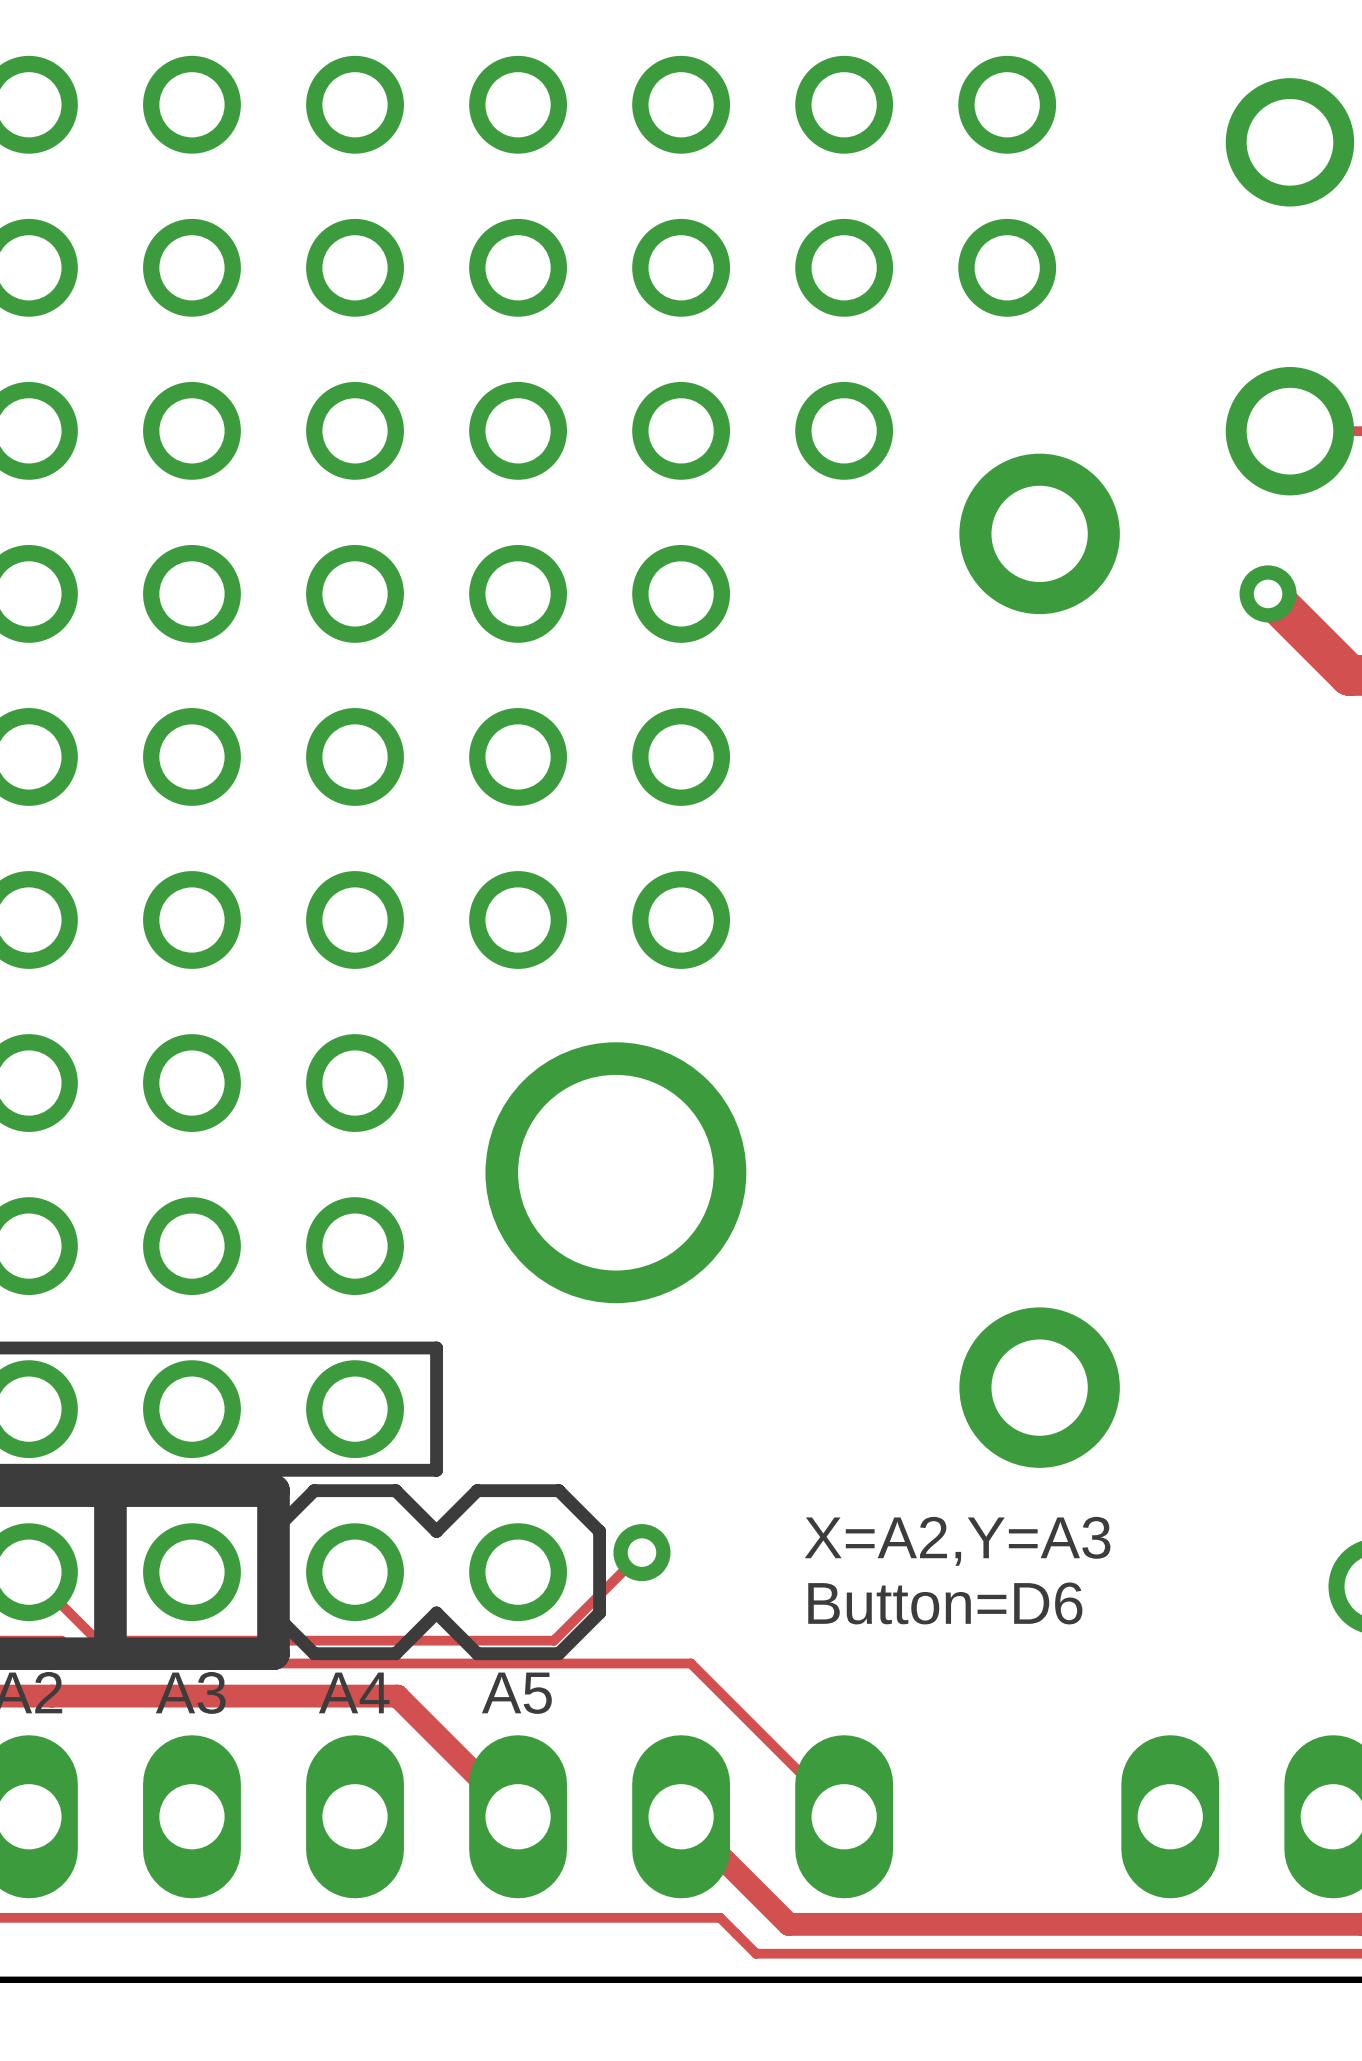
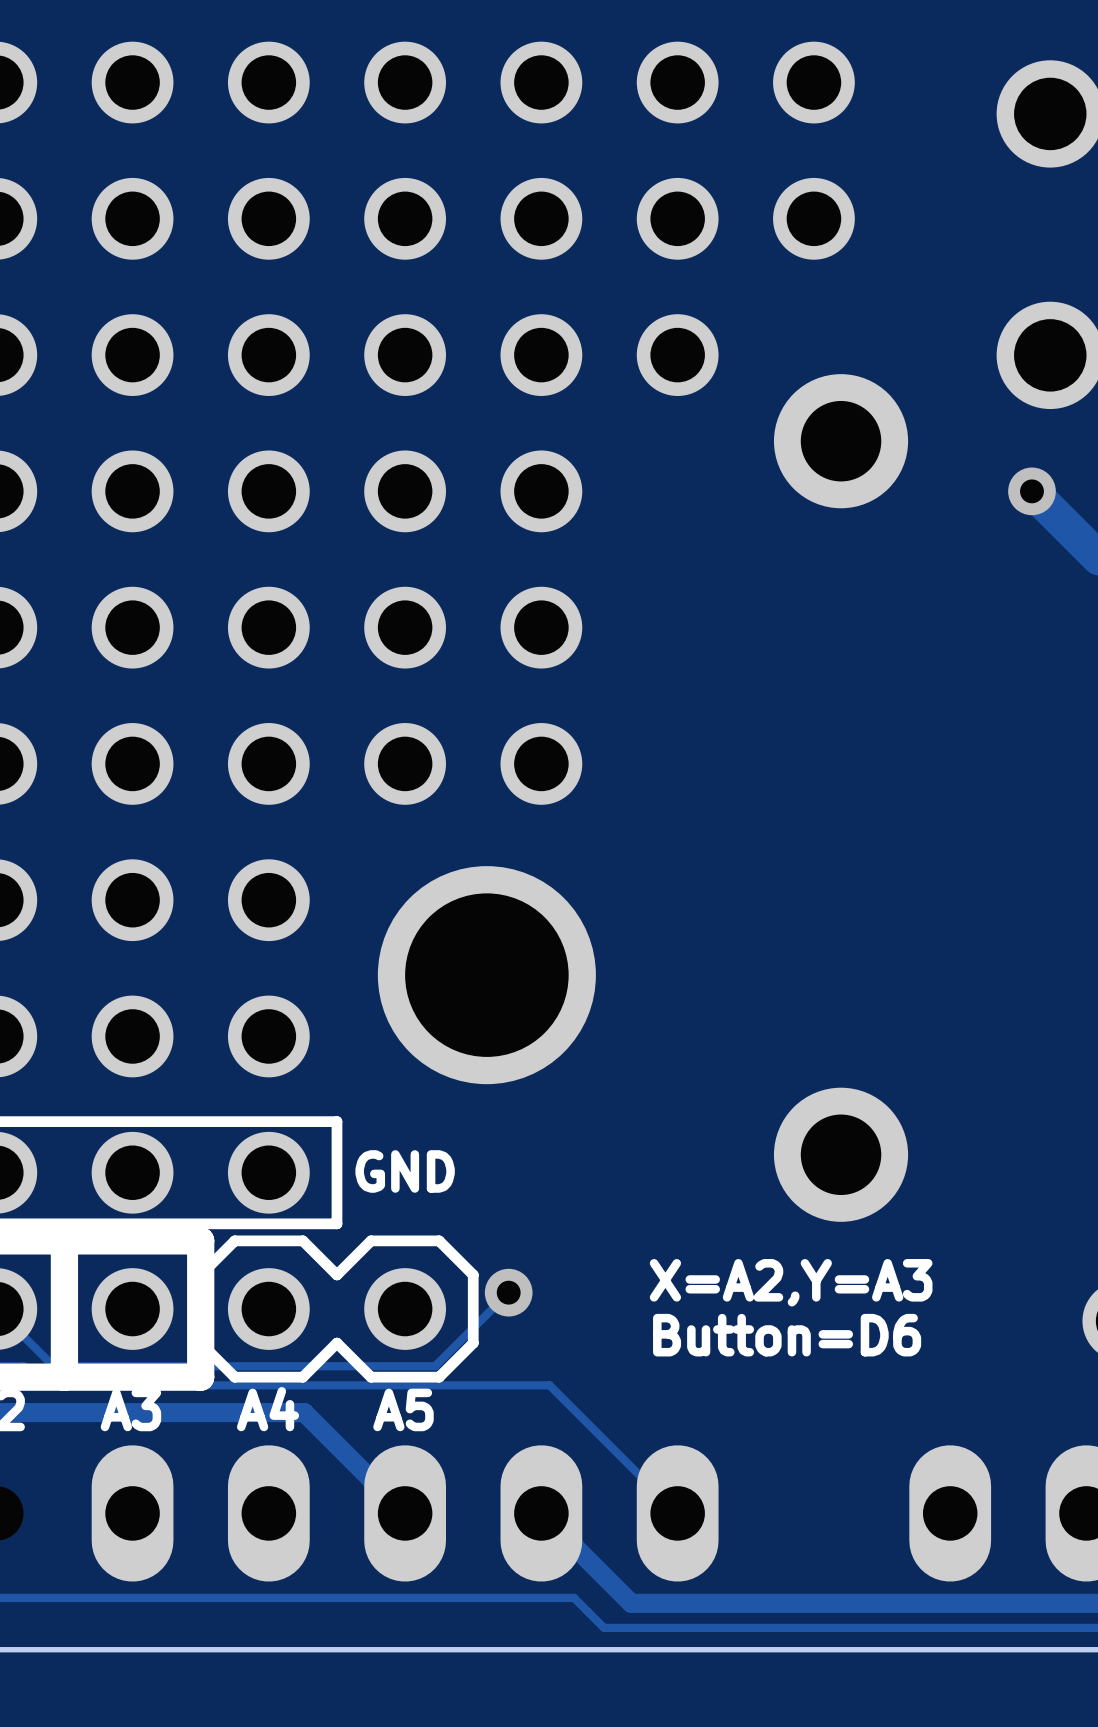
text: none -> GND (405, 1171)

